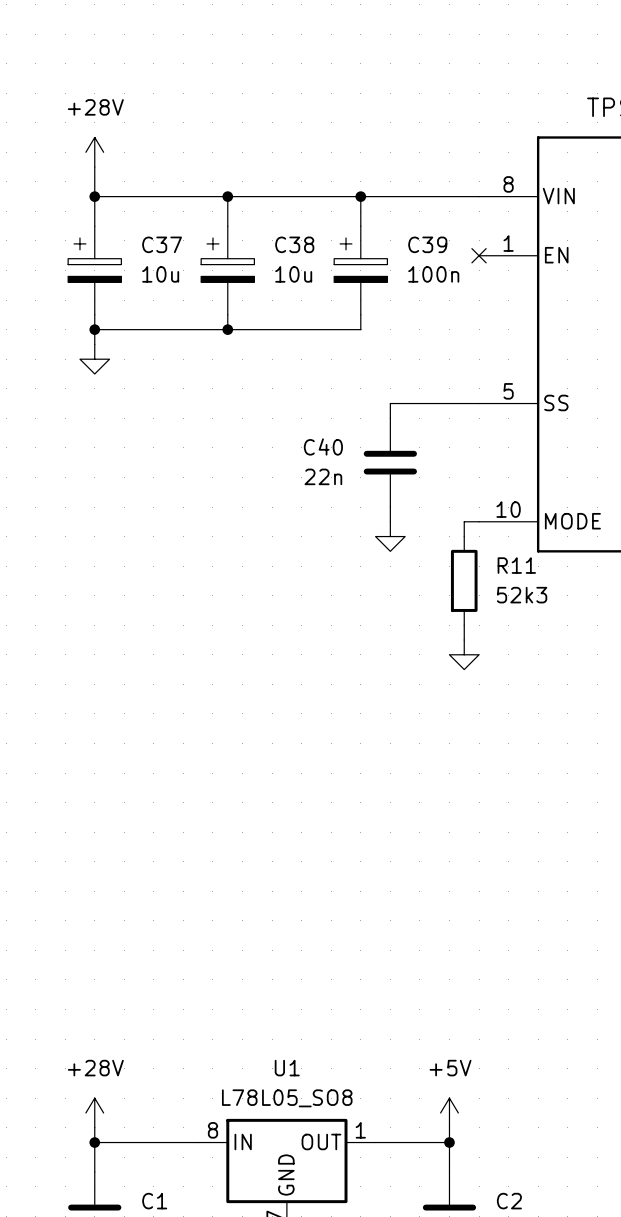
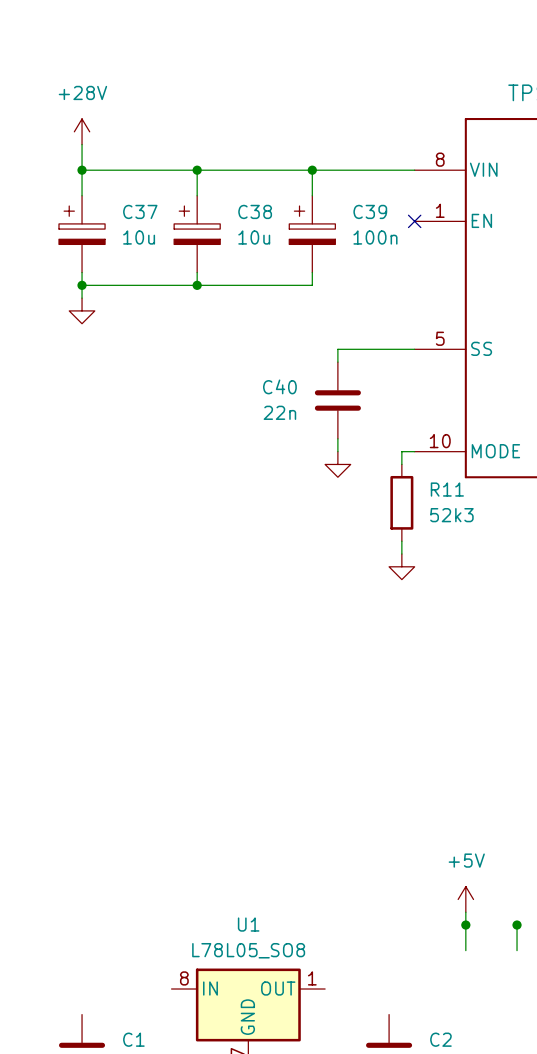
junction: none -> (465, 925)
wire: none -> (517, 925) (517, 950)
junction: none -> (517, 925)
power symbol: +28V (94, 1112) -> none
power symbol position: +5V (449, 1112) -> +5V (465, 899)
wire: (94, 1127) (94, 1172) -> none
wire: (449, 1127) (449, 1172) -> (465, 912) (465, 950)
wire: (94, 1142) (198, 1142) -> none
junction: (94, 1142) -> none
wire: (375, 1142) (449, 1142) -> none
junction: (449, 1142) -> none

